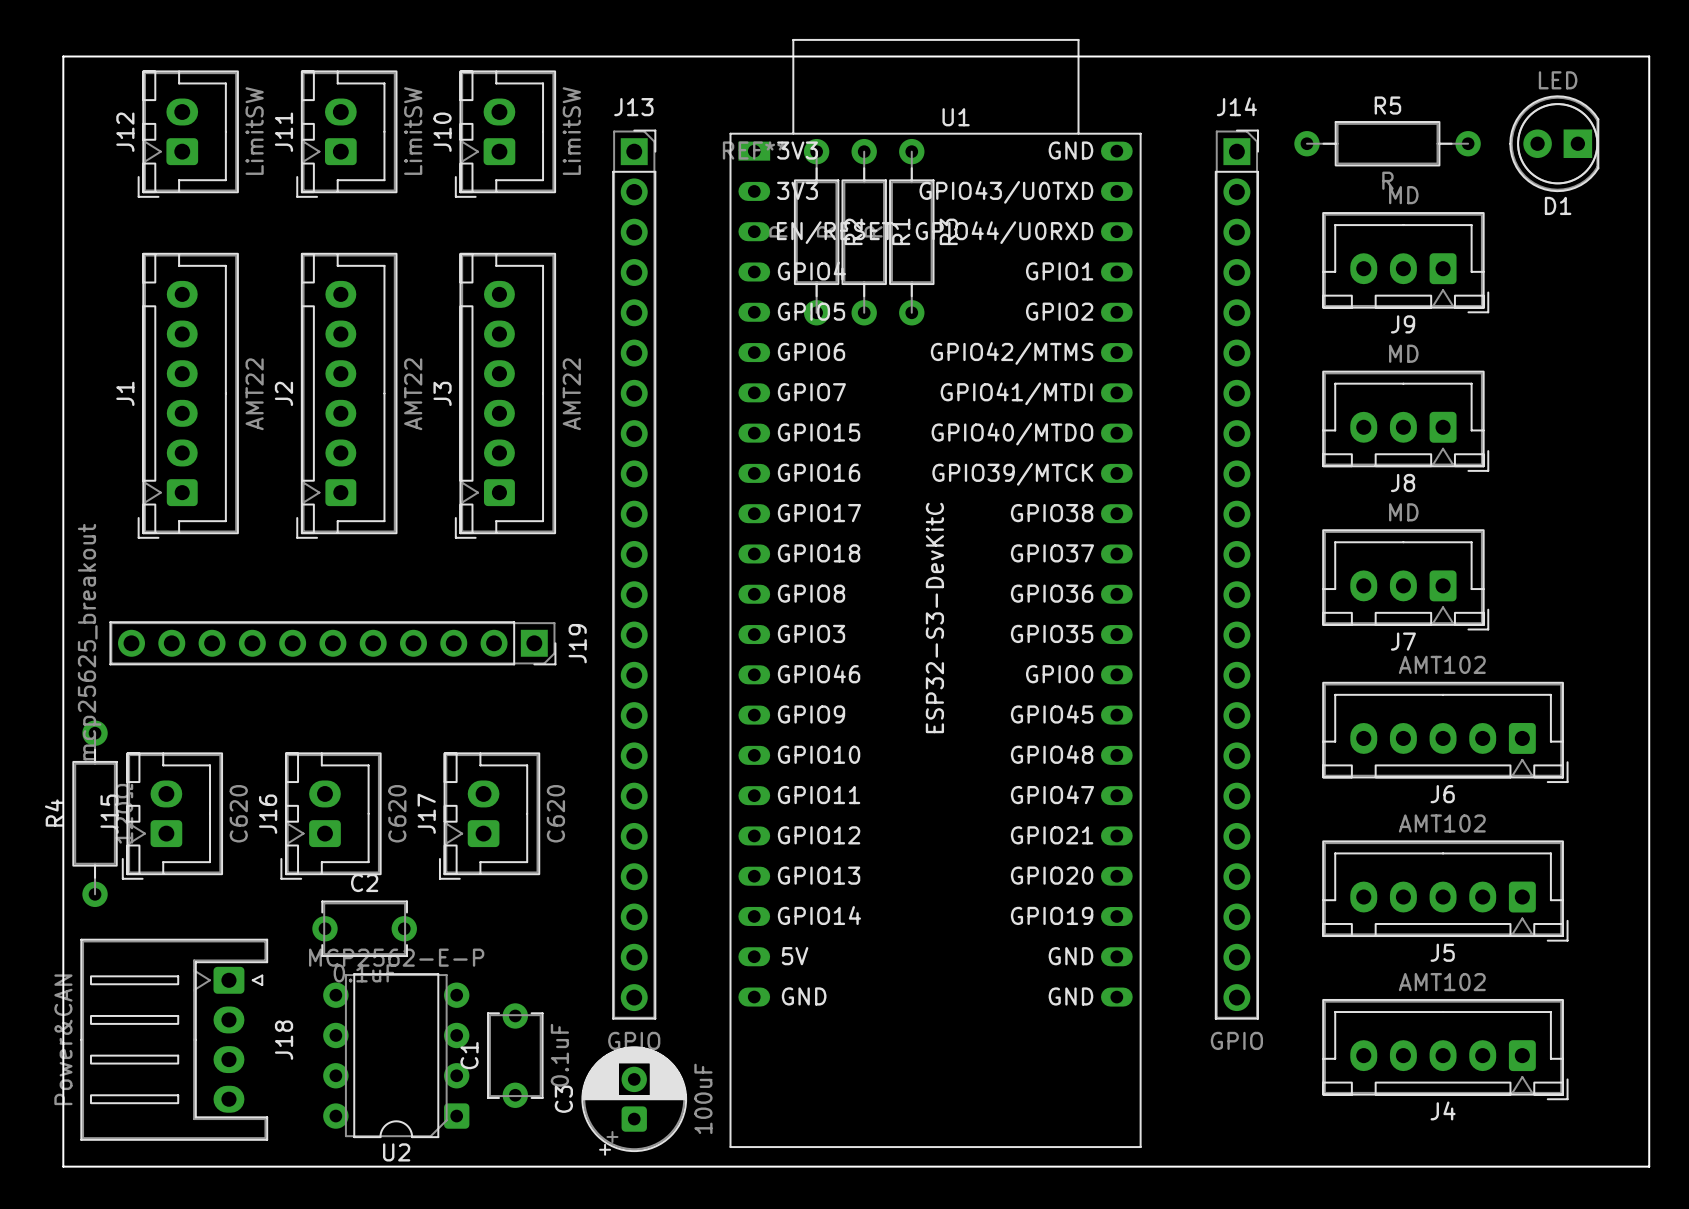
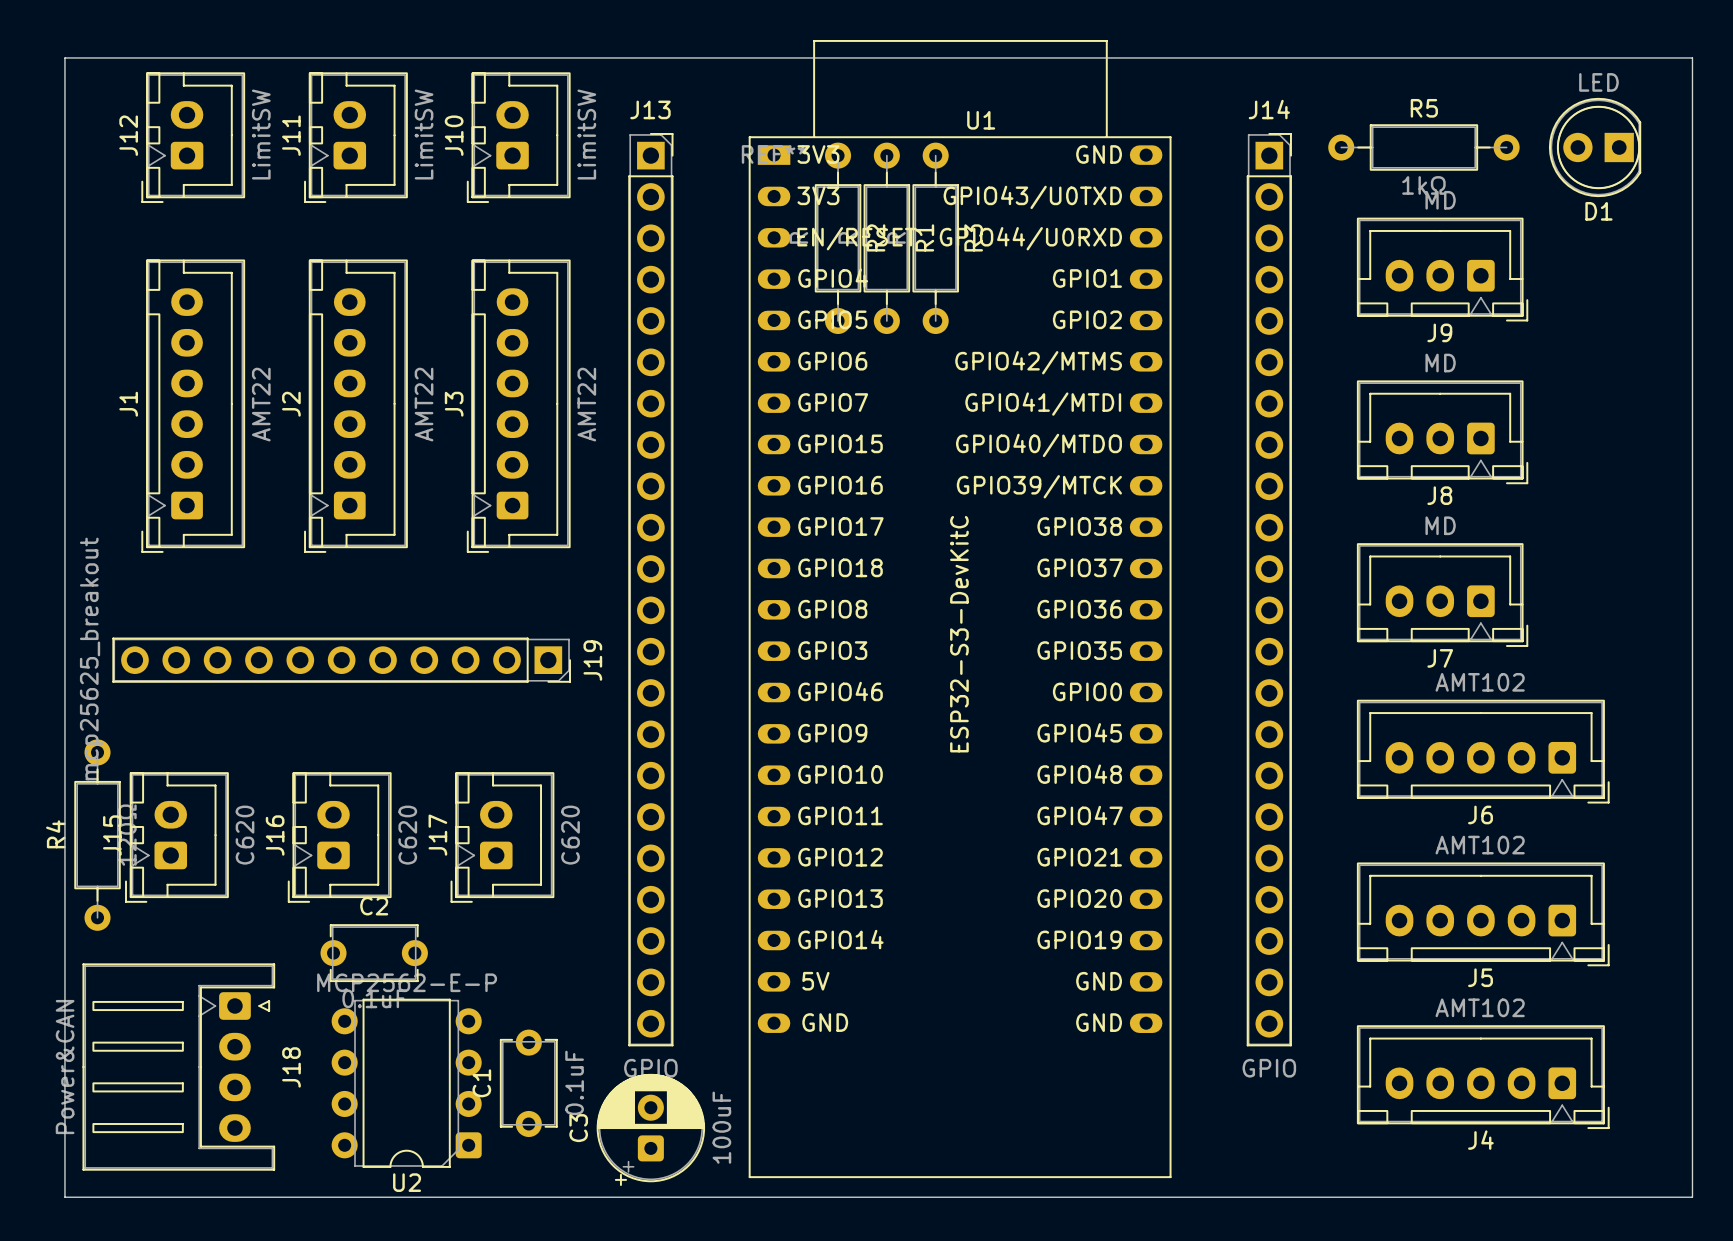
R5 value: R (1387, 180) -> 1kΩ (1423, 185)

